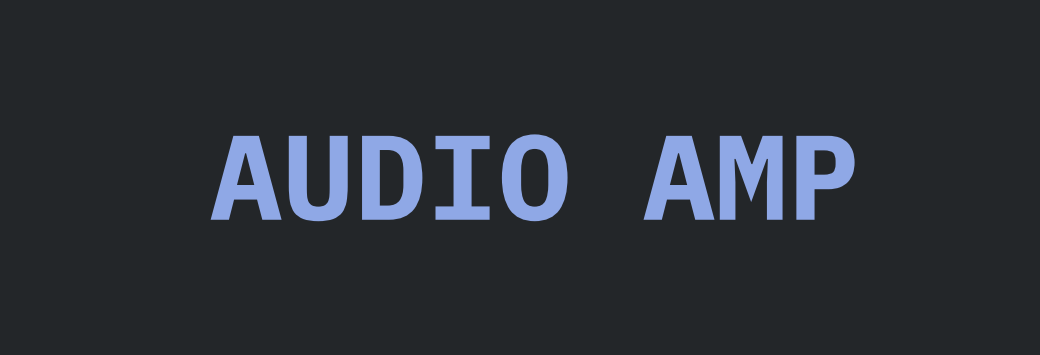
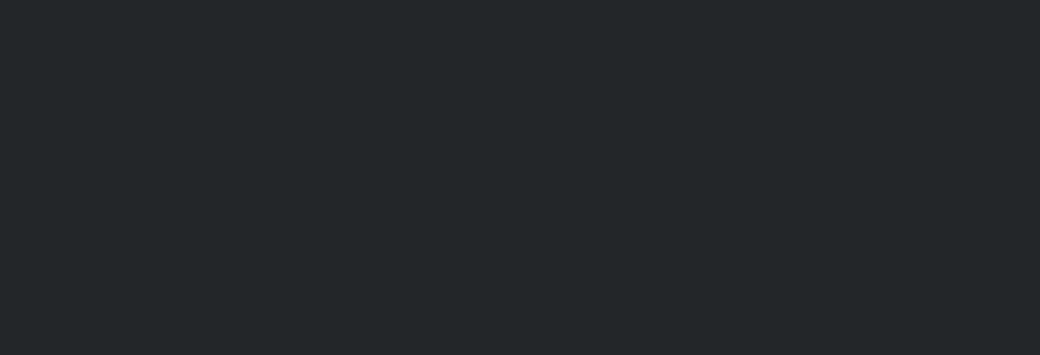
text: AUDIO AMP (532, 177) -> none

